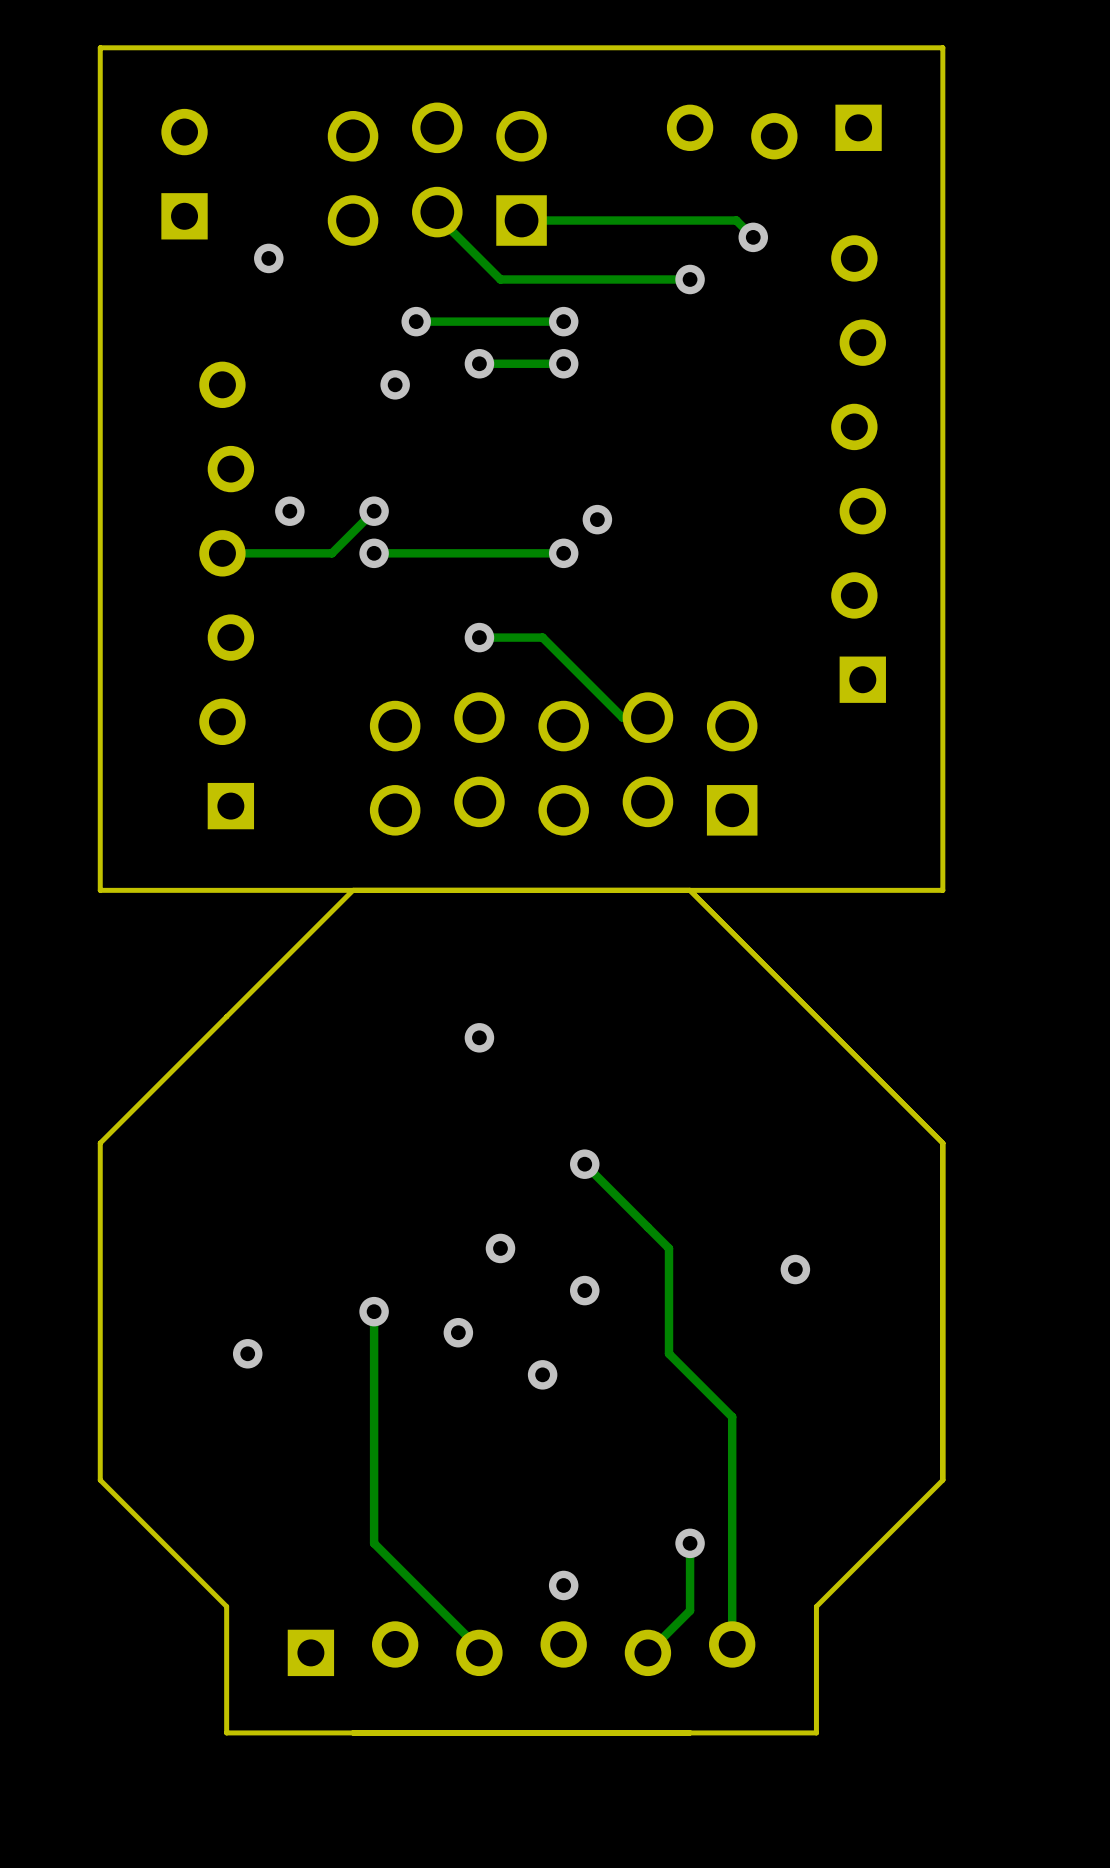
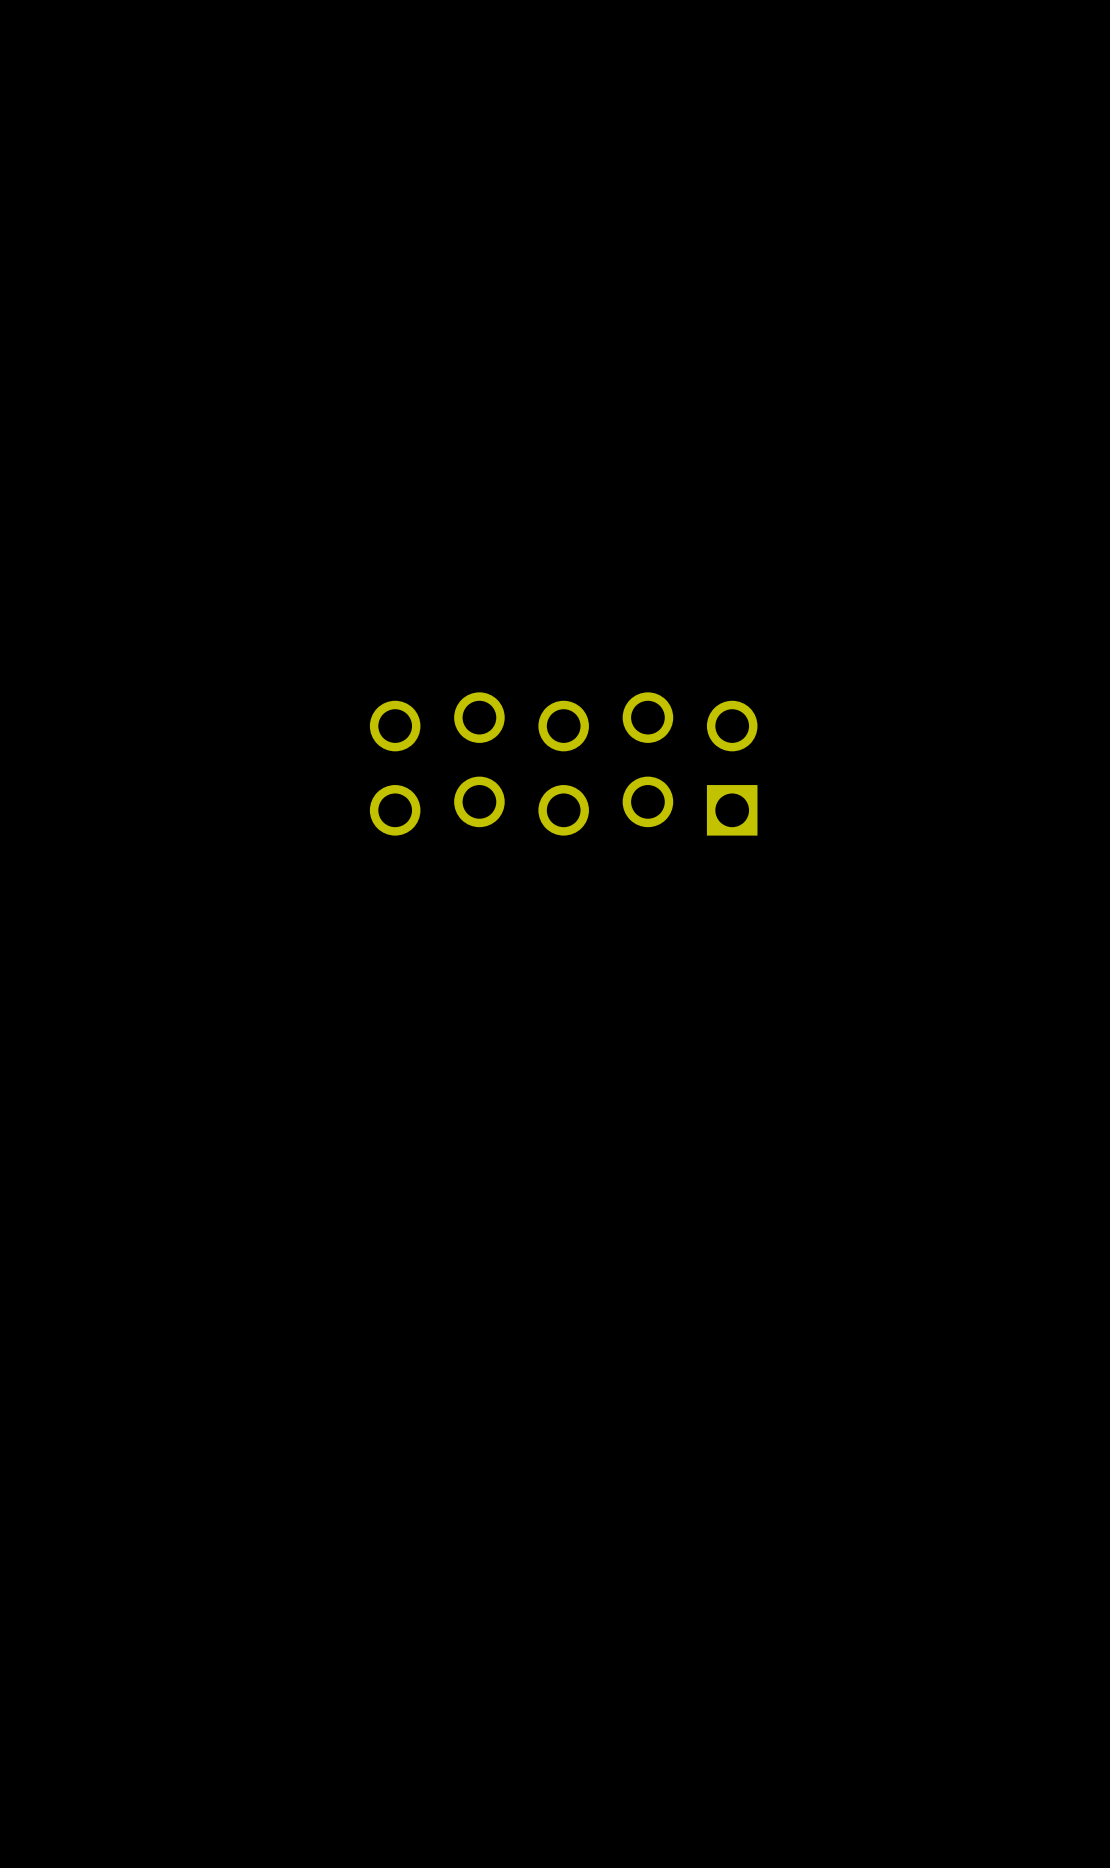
board edge: (942, 47) (100, 47) (100, 890) (942, 890) (942, 47) -> none
part: (774, 132) -> none
part: (184, 174) -> none
part: (437, 174) -> none
track: (437, 212) (437, 216) (500, 279) (690, 279) -> none
track: (521, 220) (736, 220) (753, 237) -> none
via: (753, 237) -> none
via: (268, 258) -> none
via: (690, 279) -> none
via: (416, 321) -> none
track: (563, 321) (416, 321) -> none
via: (563, 321) -> none
via: (479, 363) -> none
track: (563, 363) (479, 363) -> none
via: (563, 363) -> none
via: (395, 384) -> none
part: (858, 469) -> none
via: (289, 511) -> none
track: (374, 511) (331, 553) (222, 553) -> none
via: (374, 511) -> none
via: (597, 519) -> none
via: (374, 553) -> none
track: (563, 553) (374, 553) -> none
via: (563, 553) -> none
part: (226, 595) -> none
track: (479, 637) (542, 637) (622, 717) (647, 717) -> none
via: (479, 637) -> none
board edge: (690, 890) (942, 1143) (942, 1480) (816, 1606) (816, 1732) (226, 1732) (226, 1606) (100, 1480) (100, 1143) (353, 890) -> none
via: (479, 1037) -> none
track: (584, 1164) (669, 1248) (669, 1353) (732, 1416) (732, 1644) -> none
via: (584, 1164) -> none
via: (500, 1248) -> none
via: (795, 1269) -> none
via: (584, 1290) -> none
track: (374, 1311) (374, 1543) (479, 1648) (479, 1652) -> none
via: (374, 1311) -> none
via: (458, 1332) -> none
via: (247, 1353) -> none
via: (542, 1374) -> none
track: (690, 1543) (690, 1610) (647, 1652) -> none
via: (690, 1543) -> none
via: (563, 1585) -> none
part: (521, 1648) -> none

